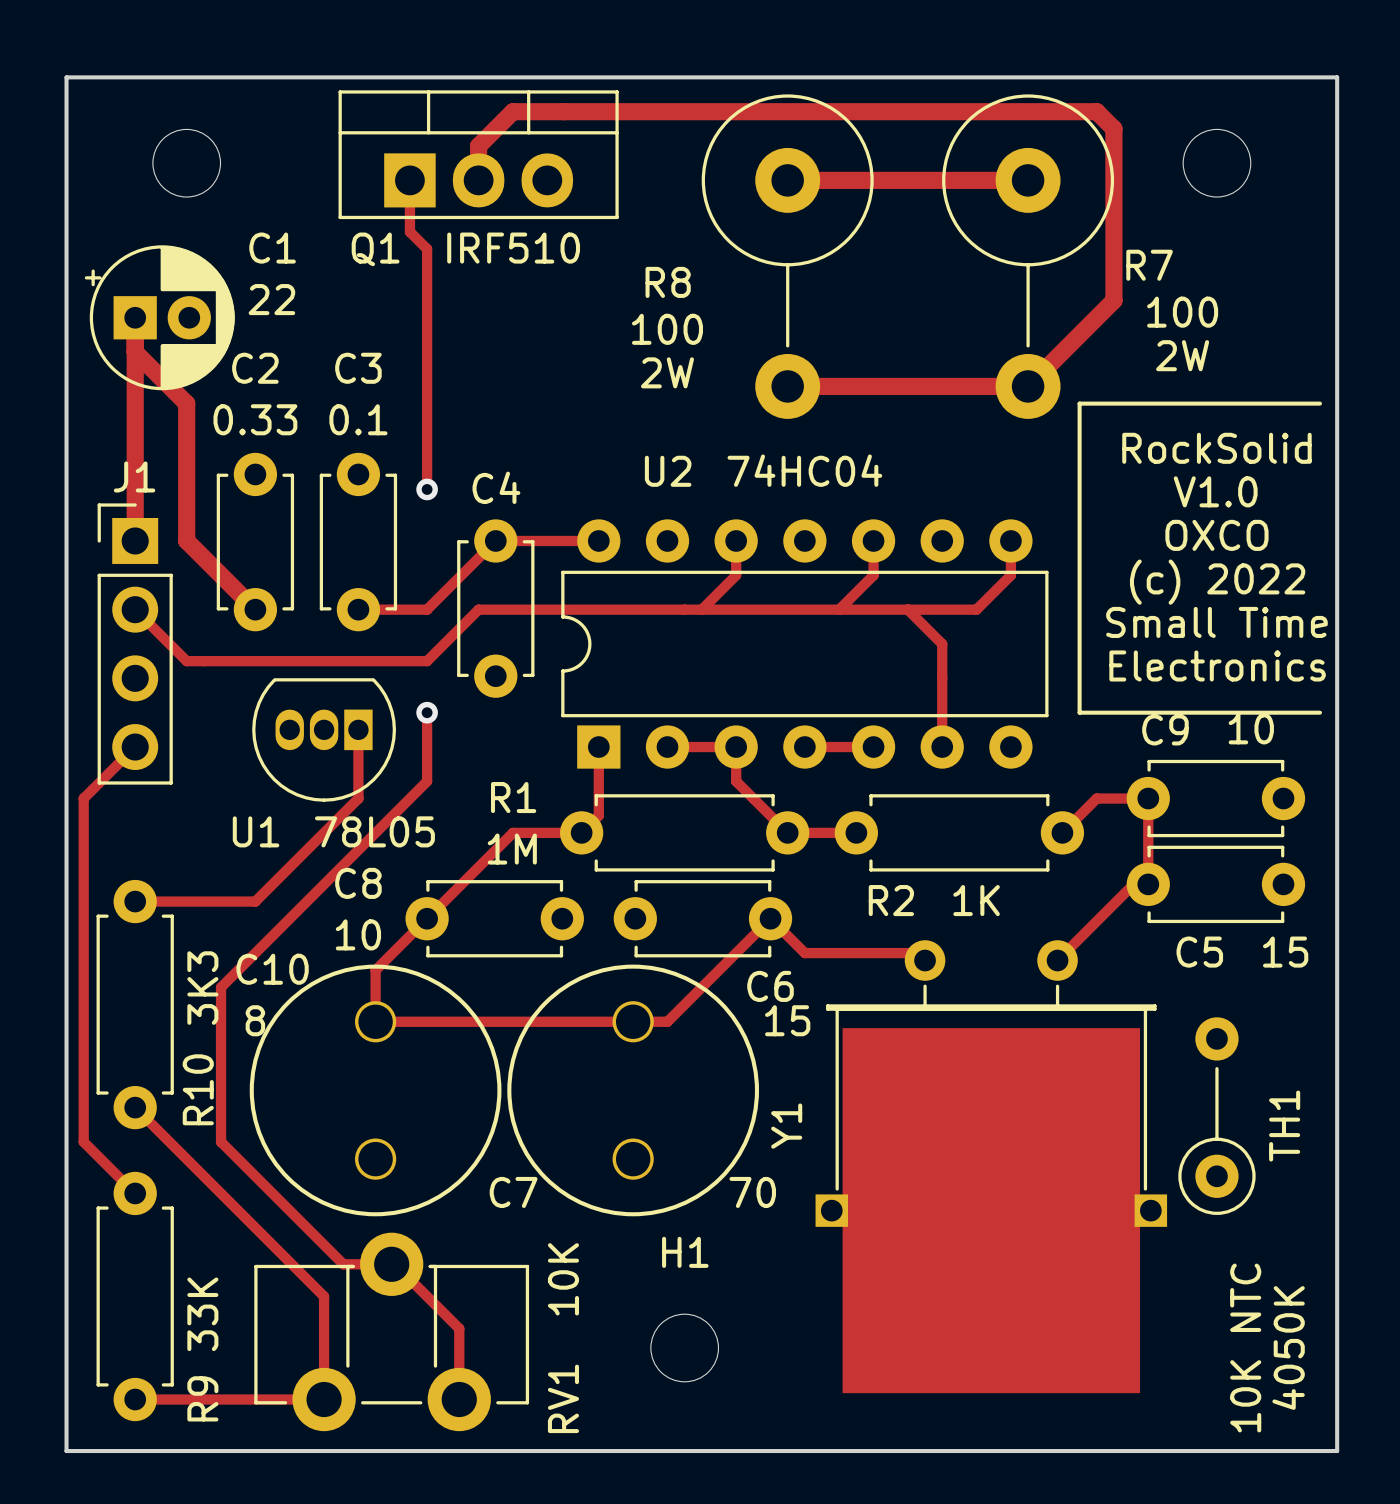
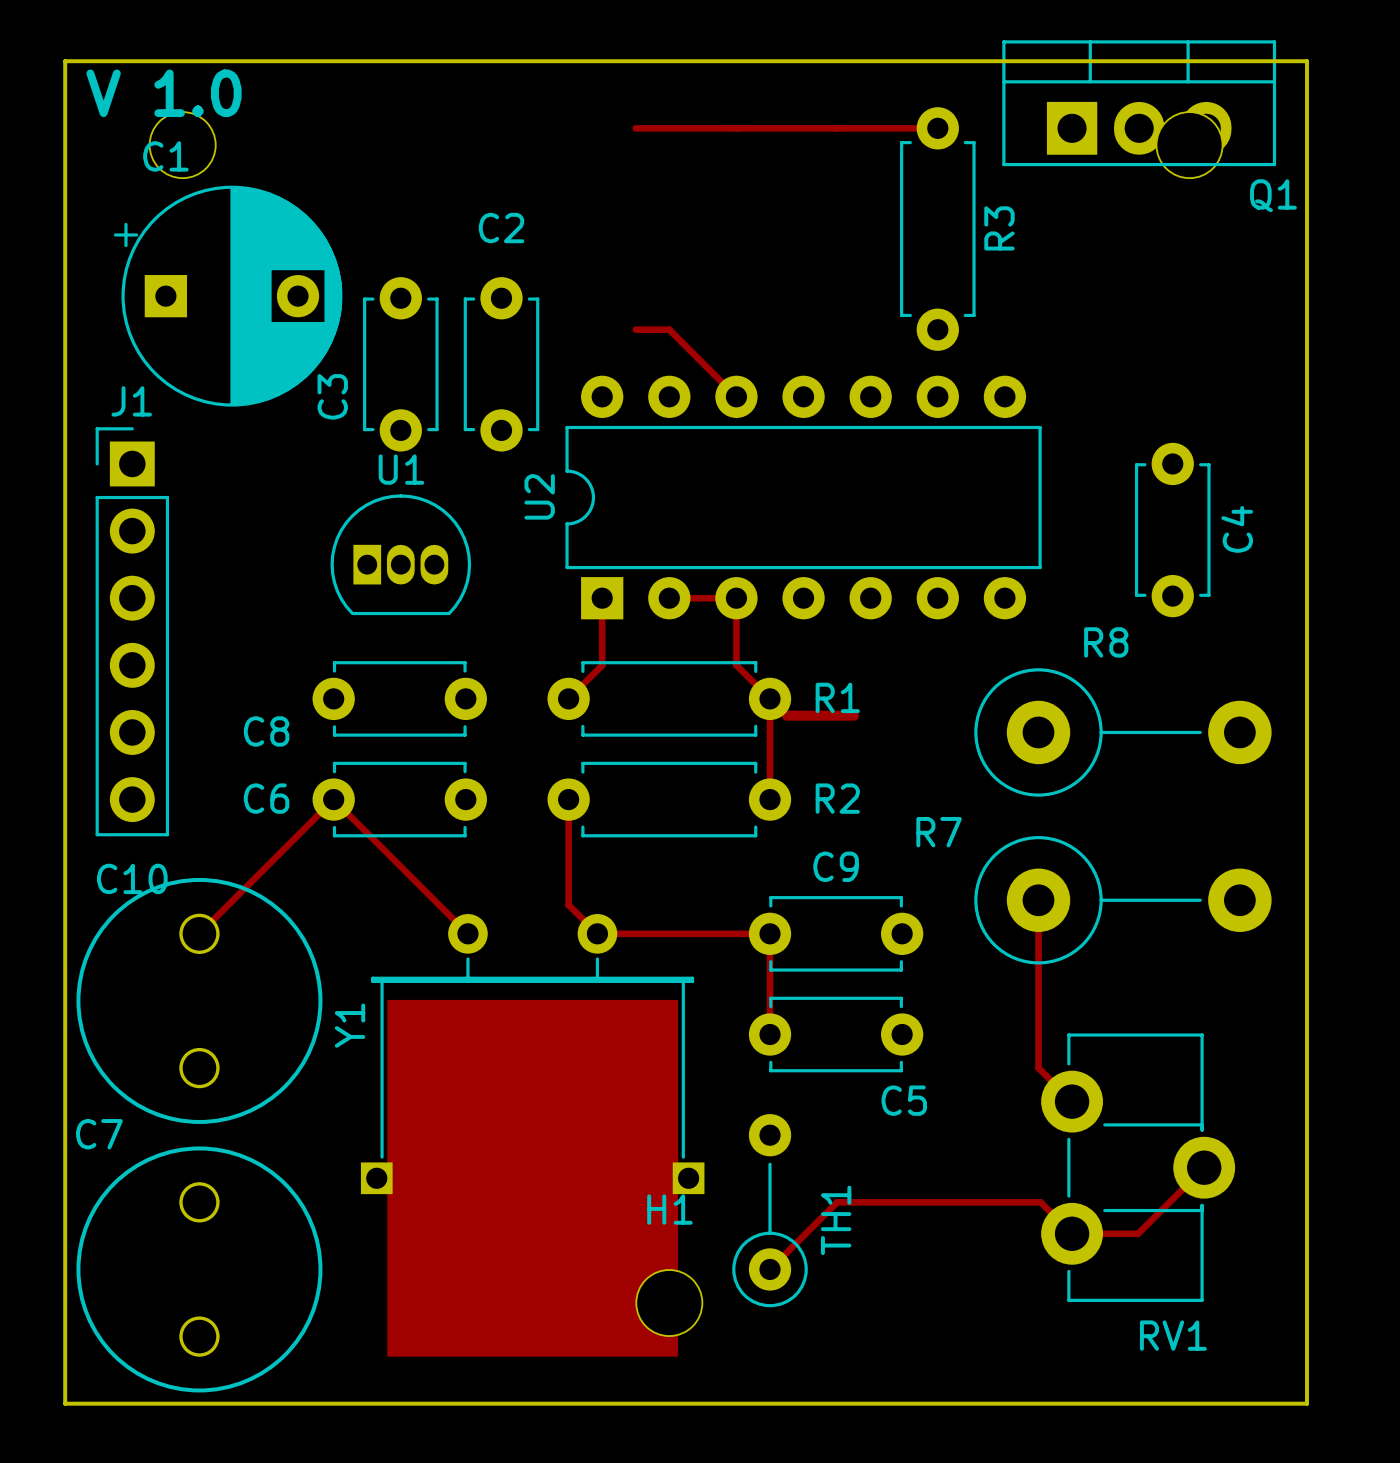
R8 footprint: [701, 94, 874, 419] -> [974, 668, 1272, 797]
R7 footprint: [942, 94, 1115, 419] -> [974, 836, 1272, 965]
text: none -> V 1.0 (164, 93)
track: none -> (635, 128) (937, 128)
Q1 position: (478, 154) -> (1139, 103)
track: (409, 180) (409, 231) (427, 249) (427, 489) -> none
track: (478, 180) (478, 146) (512, 111) (1096, 111) (1113, 128) (1113, 300) (1028, 386) (787, 386) -> none
track: (787, 180) (1028, 180) -> none
C1 footprint: [84, 245, 235, 391] -> [113, 185, 343, 407]
C1 name position: C1 (272, 248) -> C1 (165, 156)
text: IRF510 (513, 248) -> none
Q1 name position: Q1 (375, 249) -> Q1 (1273, 195)
R3: none -> (937, 229)
R7 name position: R7 (1149, 265) -> R7 (939, 832)
R8 name position: R8 (668, 282) -> R8 (1106, 642)
text: 22 (271, 299) -> none
text: 100 (1182, 312) -> none
track: (135, 317) (135, 540) -> none
text: 100 (667, 329) -> none
track: (135, 352) (186, 403) (186, 540) (255, 609) -> none
track: none -> (635, 329) (669, 329) (736, 396)
text: 2W (1182, 355) -> none
C2 name position: C2 (255, 368) -> C2 (501, 228)
C3 name rotation: 0° (358, 368) -> 90° counterclockwise (332, 396)
text: 2W (667, 372) -> none
line: (1319, 403) (1079, 403) (1079, 712) (1319, 712) -> none
text: 0.33 (255, 419) -> none
text: 0.1 (358, 419) -> none
text: RockSolid (1216, 448) -> none
text: 74HC04 (804, 470) -> none
U2 name rotation: 0° (668, 471) -> 90° counterclockwise (539, 496)
U2 name position: U2 (668, 471) -> U2 (539, 496)
J1 name position: J1 (134, 476) -> J1 (131, 401)
C4 name rotation: 0° (496, 487) -> 90° counterclockwise (1237, 529)
C4 name position: C4 (496, 487) -> C4 (1237, 529)
via: (427, 489) -> none
text: V1.0 (1215, 491) -> none
J1 footprint: [97, 503, 173, 785] -> [95, 427, 170, 837]
text: OXCO (1216, 535) -> none
track: (598, 540) (495, 540) (427, 609) (358, 609) -> none
track: (736, 540) (736, 575) (701, 609) -> none
track: (873, 540) (873, 575) (839, 609) -> none
track: (1010, 540) (1010, 575) (976, 609) (478, 609) (427, 661) (186, 661) (135, 609) -> none
C2 position: (255, 542) -> (501, 364)
C3 position: (358, 542) -> (400, 364)
text: (c) 2022 (1217, 582) -> none
C4 position: (495, 608) -> (1172, 530)
track: (907, 609) (942, 644) (942, 747) -> none
text: Small Time (1216, 622) -> none
track: none -> (602, 598) (602, 665) (568, 698)
track: none -> (669, 598) (736, 598) (736, 665) (770, 698) (770, 799)
U2 position: (804, 644) -> (803, 497)
text: Electronics (1217, 665) -> none
track: (427, 712) (427, 781) (221, 987) (221, 1141) (343, 1264) (391, 1264) -> none
via: (427, 712) -> none
text: 10 (1251, 728) -> none
track: (358, 729) (358, 798) (255, 901) (135, 901) -> none
R1: none -> (669, 698)
C9 name position: C9 (1165, 729) -> C9 (836, 866)
U1 rotation: 0° (324, 739) -> 180° (400, 554)
U1 position: (324, 739) -> (400, 554)
track: (135, 747) (83, 798) (83, 1141) (135, 1193) -> none
track: (598, 747) (598, 815) (581, 832) (512, 832) (375, 970) (375, 1021) (667, 1021) (770, 918) (804, 953) (925, 953) (925, 970) -> none
track: (667, 747) (736, 747) (736, 781) (787, 832) (856, 832) -> none
R1 name: R1 (513, 797) -> R2 (837, 798)
C9 position: (1215, 798) -> (836, 933)
U1 name position: U1 (256, 831) -> U1 (401, 469)
text: 78L05 (374, 831) -> none
track: none -> (568, 799) (568, 905) (597, 933) (770, 933) (770, 1034)
R2: (959, 832) -> none
track: (1062, 832) (1096, 798) (1148, 798) (1148, 884) (1133, 884) (1057, 960) -> none
text: 1M (512, 849) -> none
C8 name position: C8 (358, 883) -> C8 (266, 731)
C5 position: (1215, 884) -> (836, 1034)
text: 1K (976, 900) -> none
C8 position: (494, 918) -> (399, 698)
C6 position: (702, 918) -> (399, 799)
text: 10 (358, 934) -> none
track: none -> (1038, 900) (1038, 1068) (1072, 1101)
C5 name position: C5 (1199, 952) -> C5 (904, 1100)
text: 15 (1285, 952) -> none
C10 name position: C10 (272, 969) -> C10 (132, 878)
track: none -> (199, 933) (333, 799) (467, 933)
C6 name position: C6 (770, 986) -> C6 (266, 798)
text: 3K3 (202, 988) -> none
R10: (135, 1004) -> none
text: 8 (255, 1020) -> none
text: 15 (787, 1020) -> none
C10 position: (375, 1090) -> (199, 1000)
C7 position: (633, 1090) -> (199, 1269)
track: (135, 1107) (324, 1296) (324, 1399) (135, 1399) -> none
TH1 position: (1216, 1116) -> (770, 1210)
Y1 name position: Y1 (786, 1126) -> Y1 (350, 1025)
Y1 position: (991, 1166) -> (532, 1135)
C7 name position: C7 (513, 1192) -> C7 (99, 1134)
text: 70 (752, 1192) -> none
track: none -> (1204, 1167) (1138, 1233) (1072, 1233) (1040, 1202) (837, 1202) (770, 1269)
track: (392, 1262) (459, 1328) (459, 1399) -> none
text: 10K (563, 1279) -> none
R9: (135, 1296) -> none
text: 33K (202, 1314) -> none
RV1 rotation: 0° (391, 1331) -> 90° clockwise (1138, 1167)
RV1 position: (391, 1331) -> (1138, 1167)
text: 10K NTC (1245, 1348) -> none
text: 4050K (1288, 1348) -> none
RV1 name position: RV1 (563, 1398) -> RV1 (1173, 1335)

